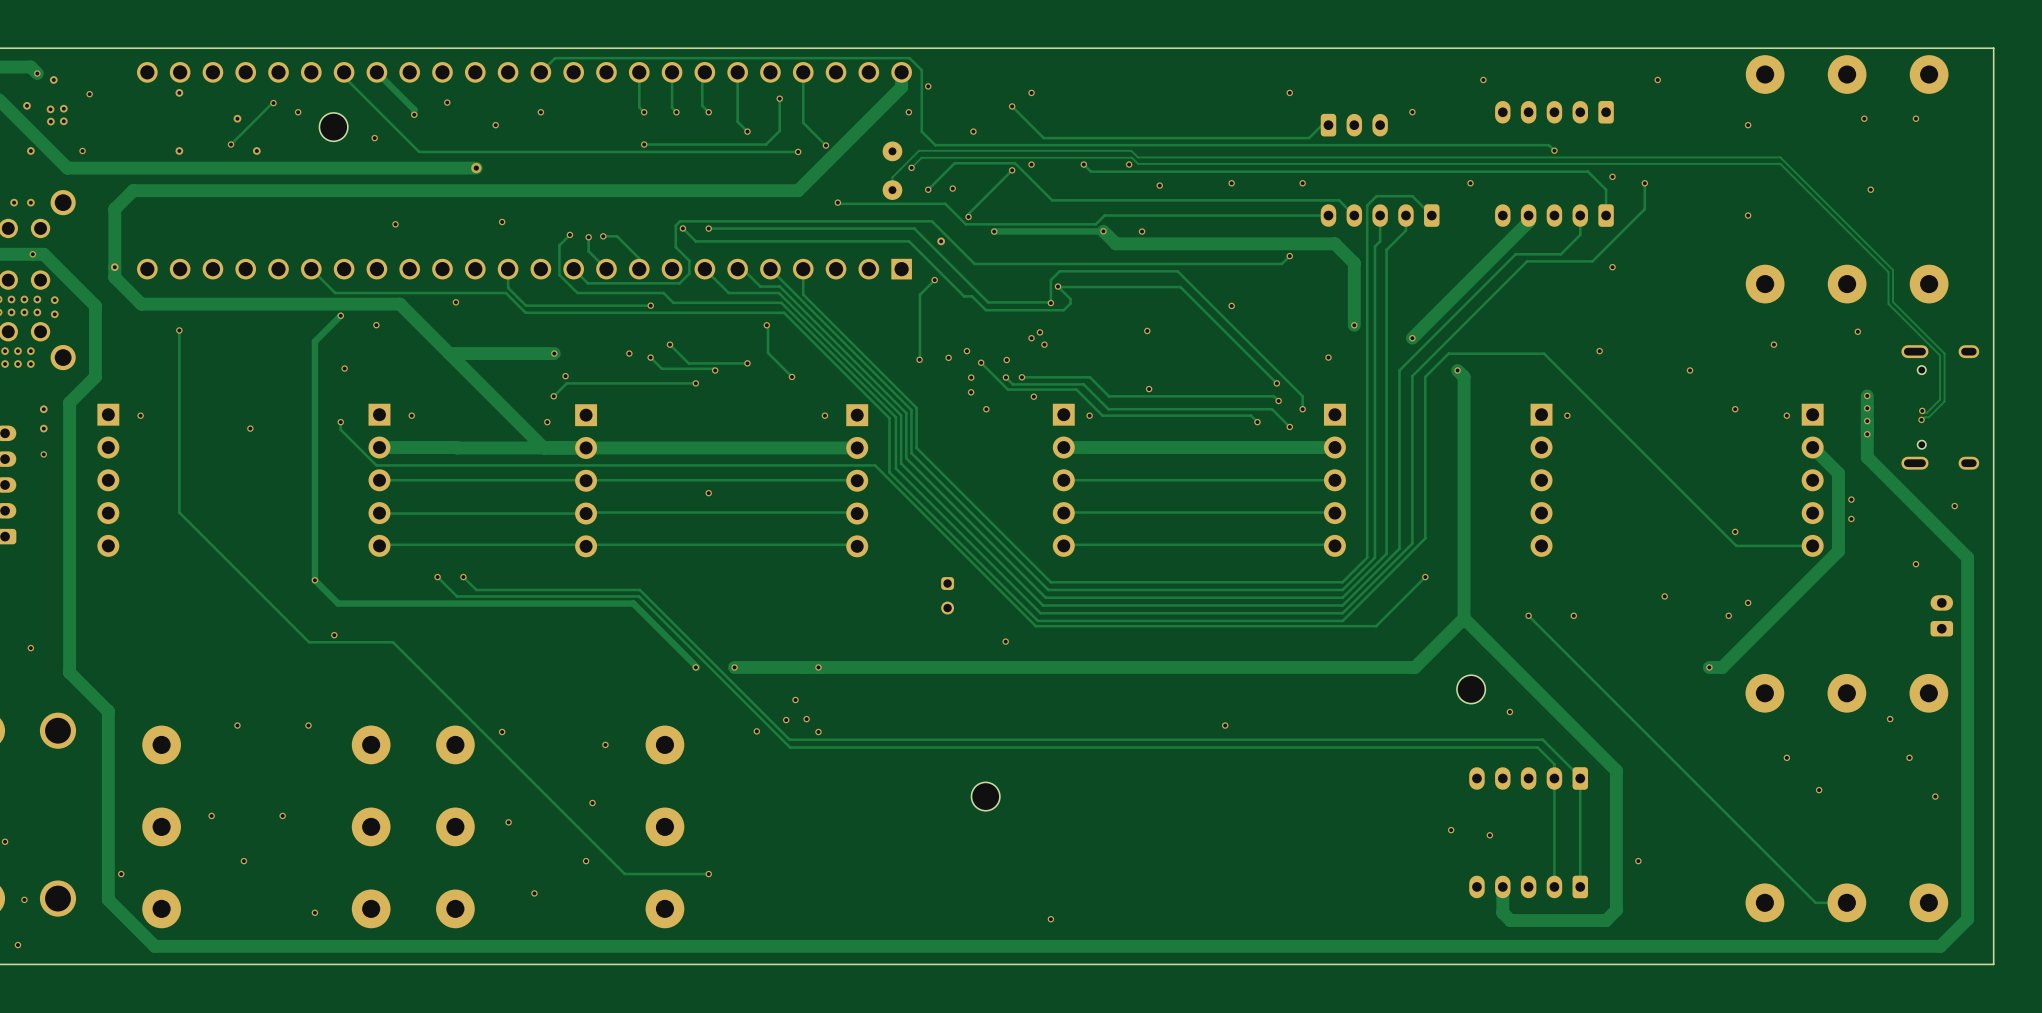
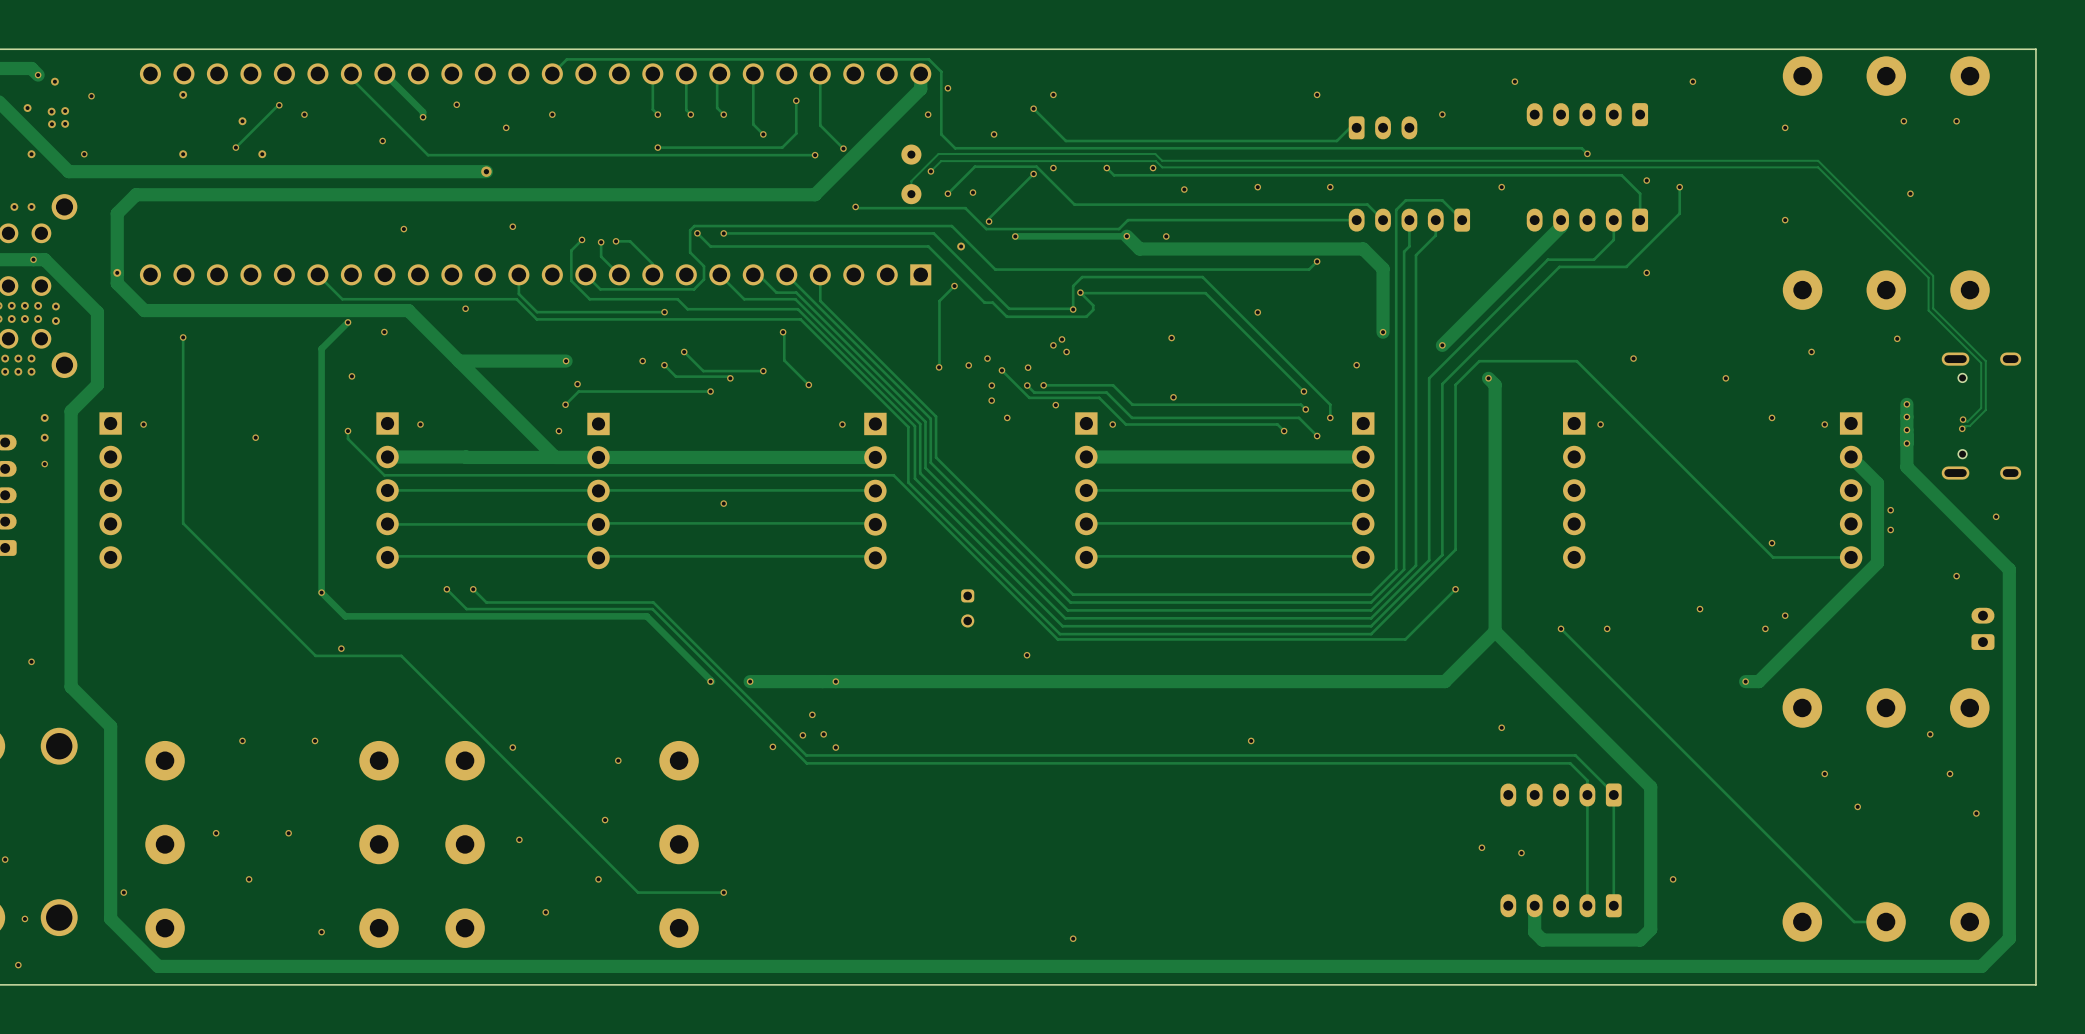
part: (333, 127) -> none
part: (1471, 689) -> none
via position: (1509, 712) -> (1501, 727)
part: (985, 796) -> none

